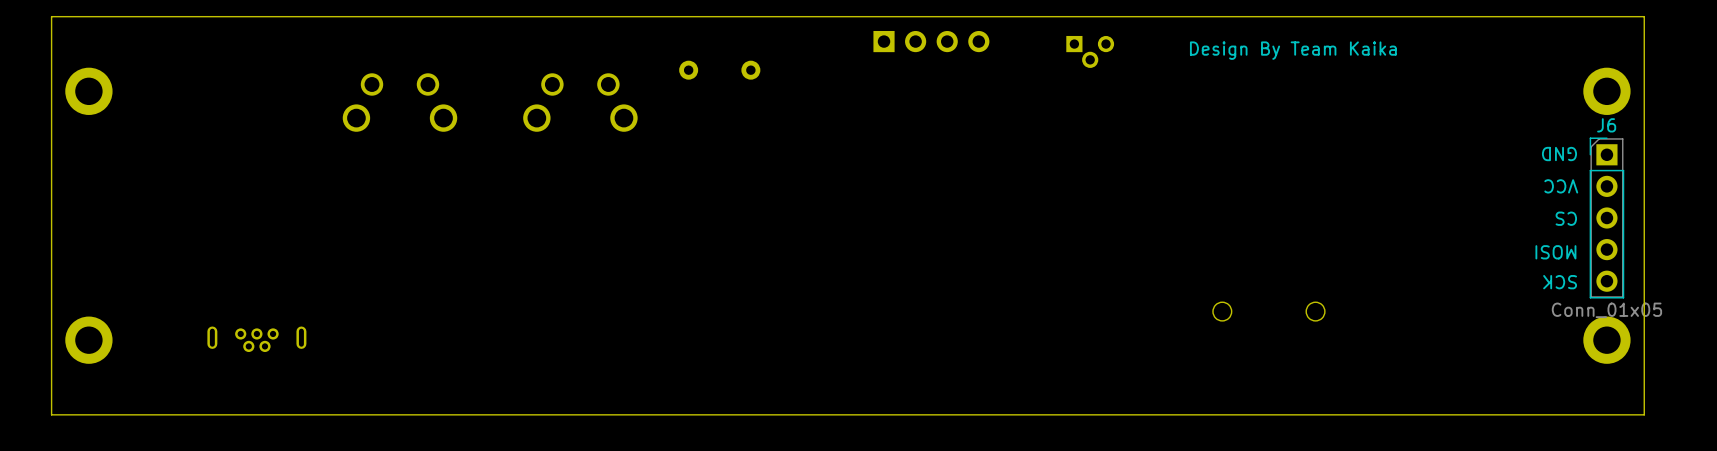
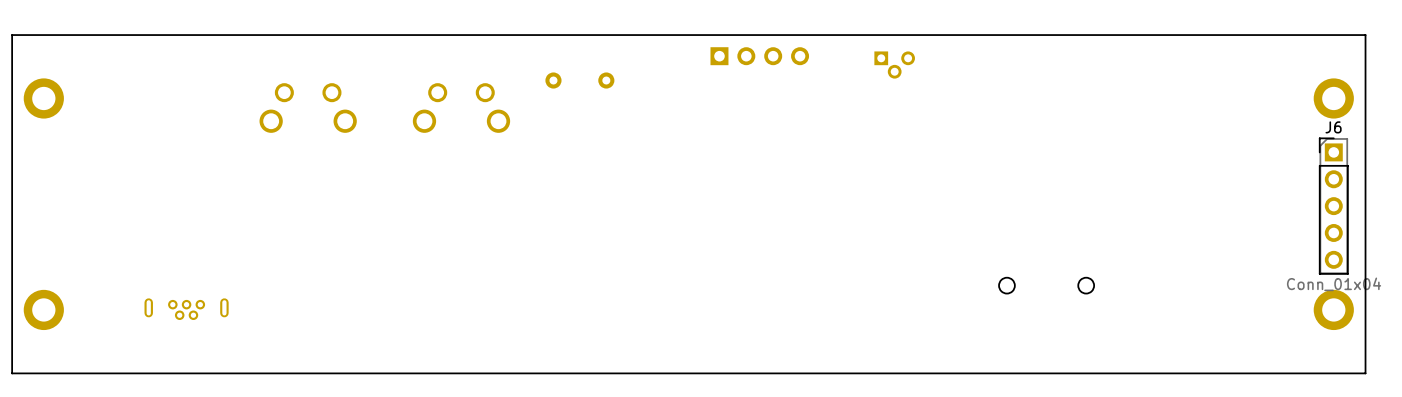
text: Design By Team Kaika (1293, 50) -> none
text: GND (1559, 154) -> none
text: VCC (1561, 186) -> none
text: CS (1566, 218) -> none
text: MOSI (1555, 252) -> none
text: SCK (1560, 282) -> none
J6 value: Conn_01x05 (1606, 310) -> Conn_01x04 (1334, 284)

